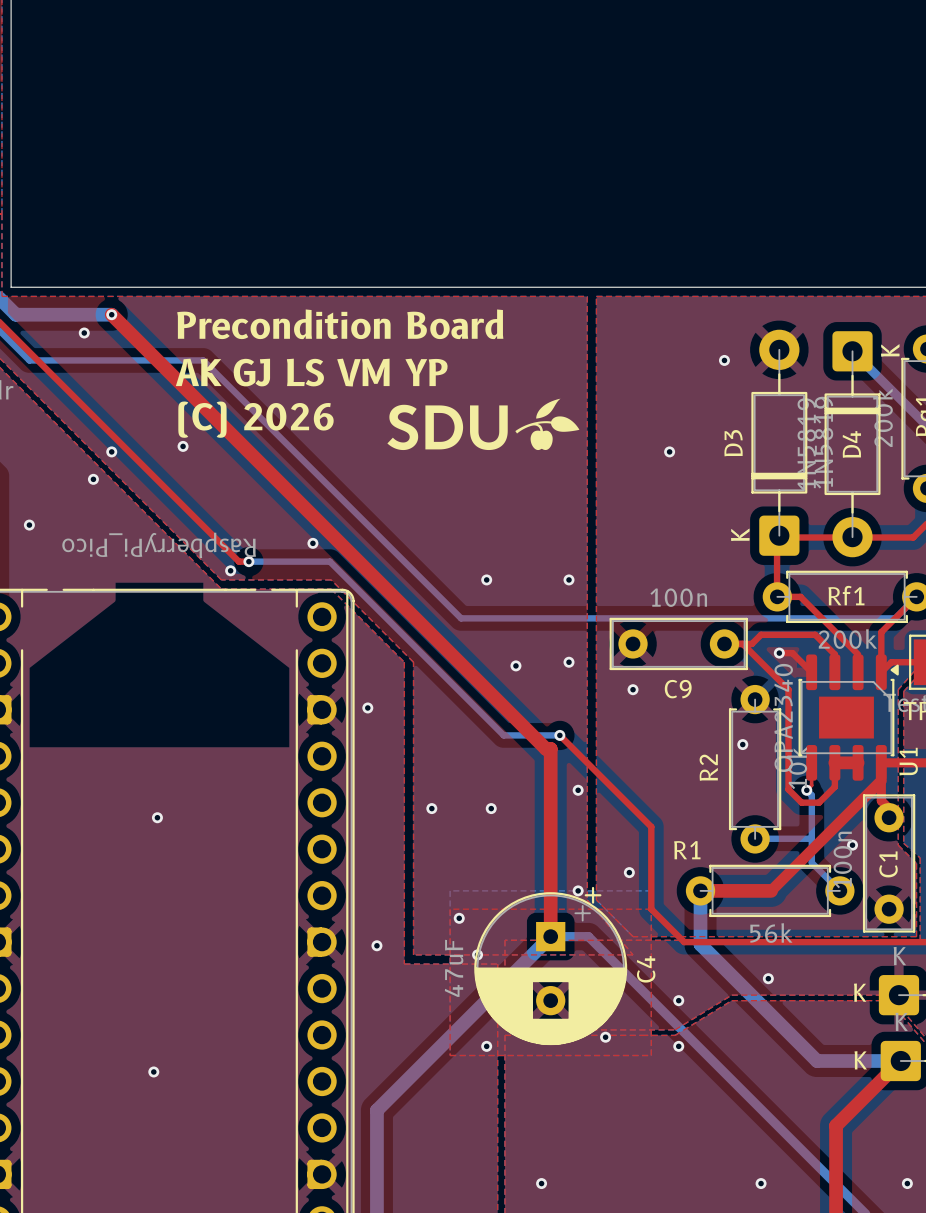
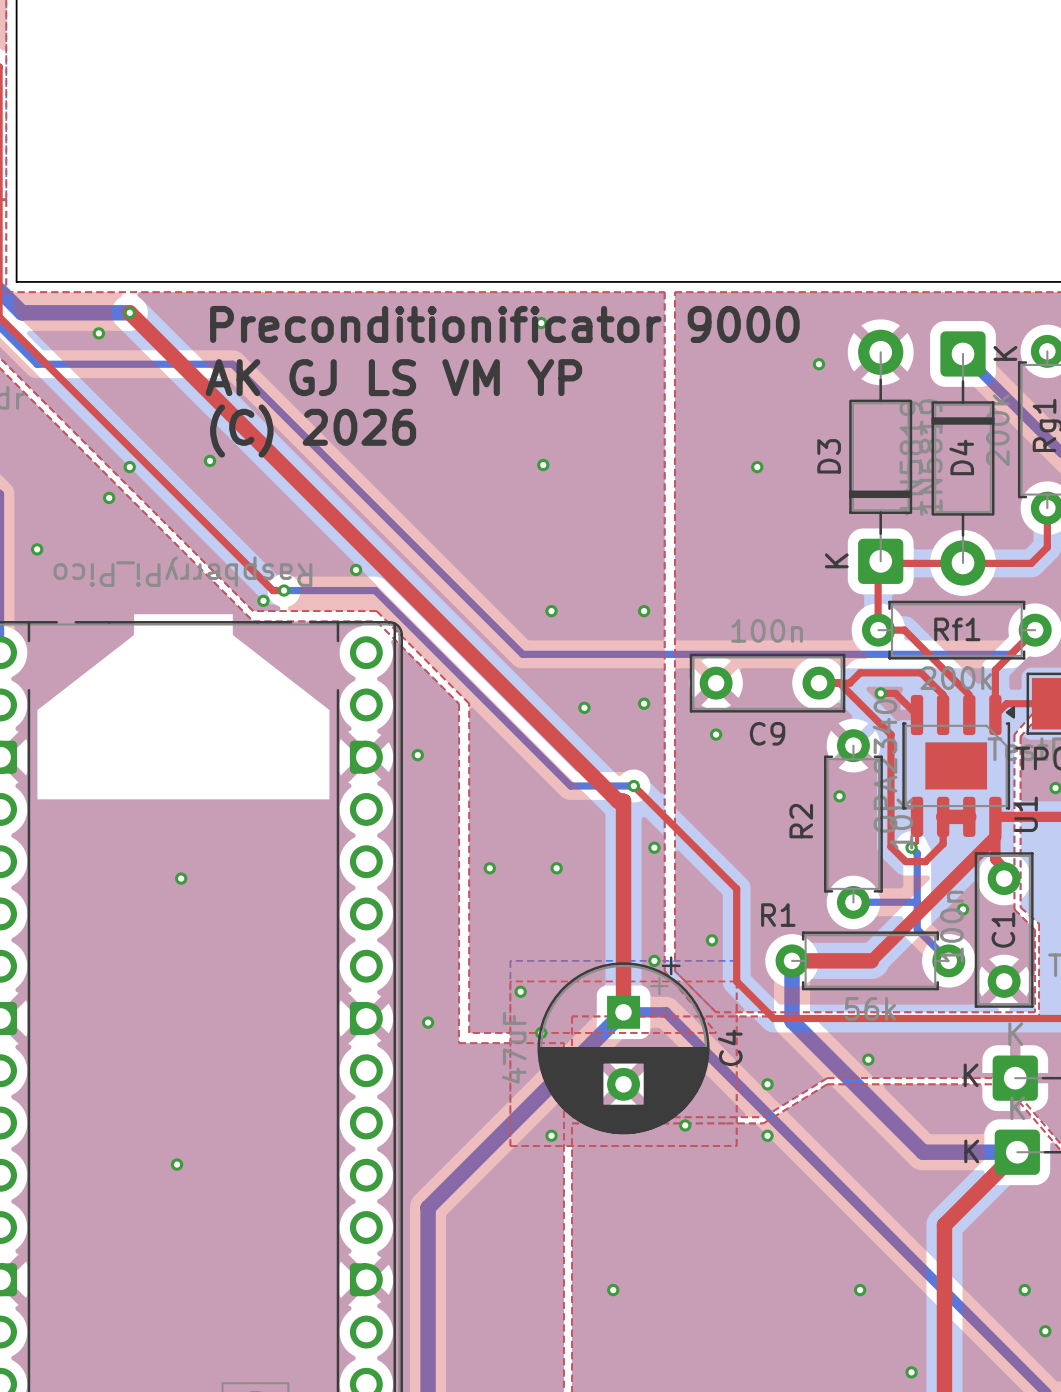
via: none -> (541, 323)
text: Precondition Board (340, 324) -> Preconditionificator 9000 (504, 324)
drawing: [387, 398, 580, 451] -> none
via: none -> (543, 465)

